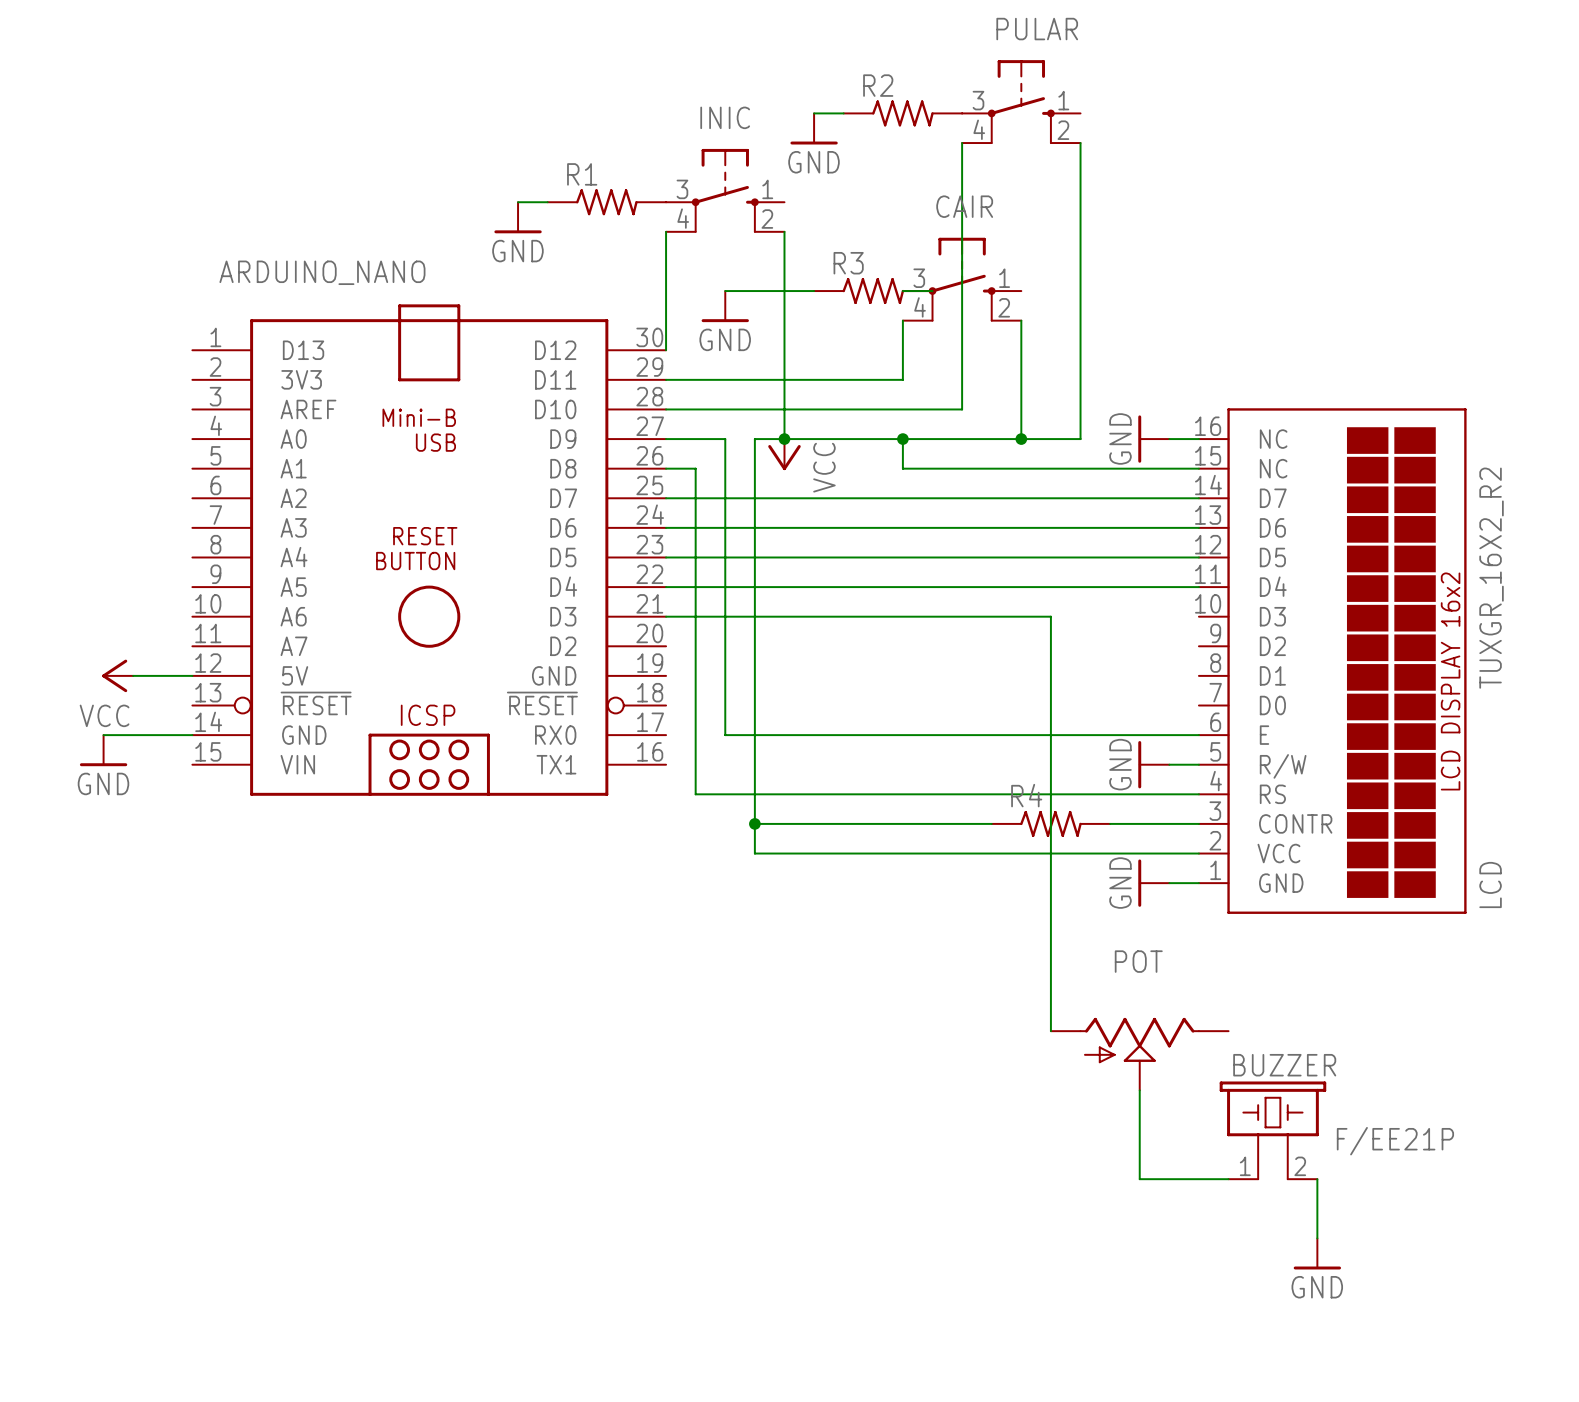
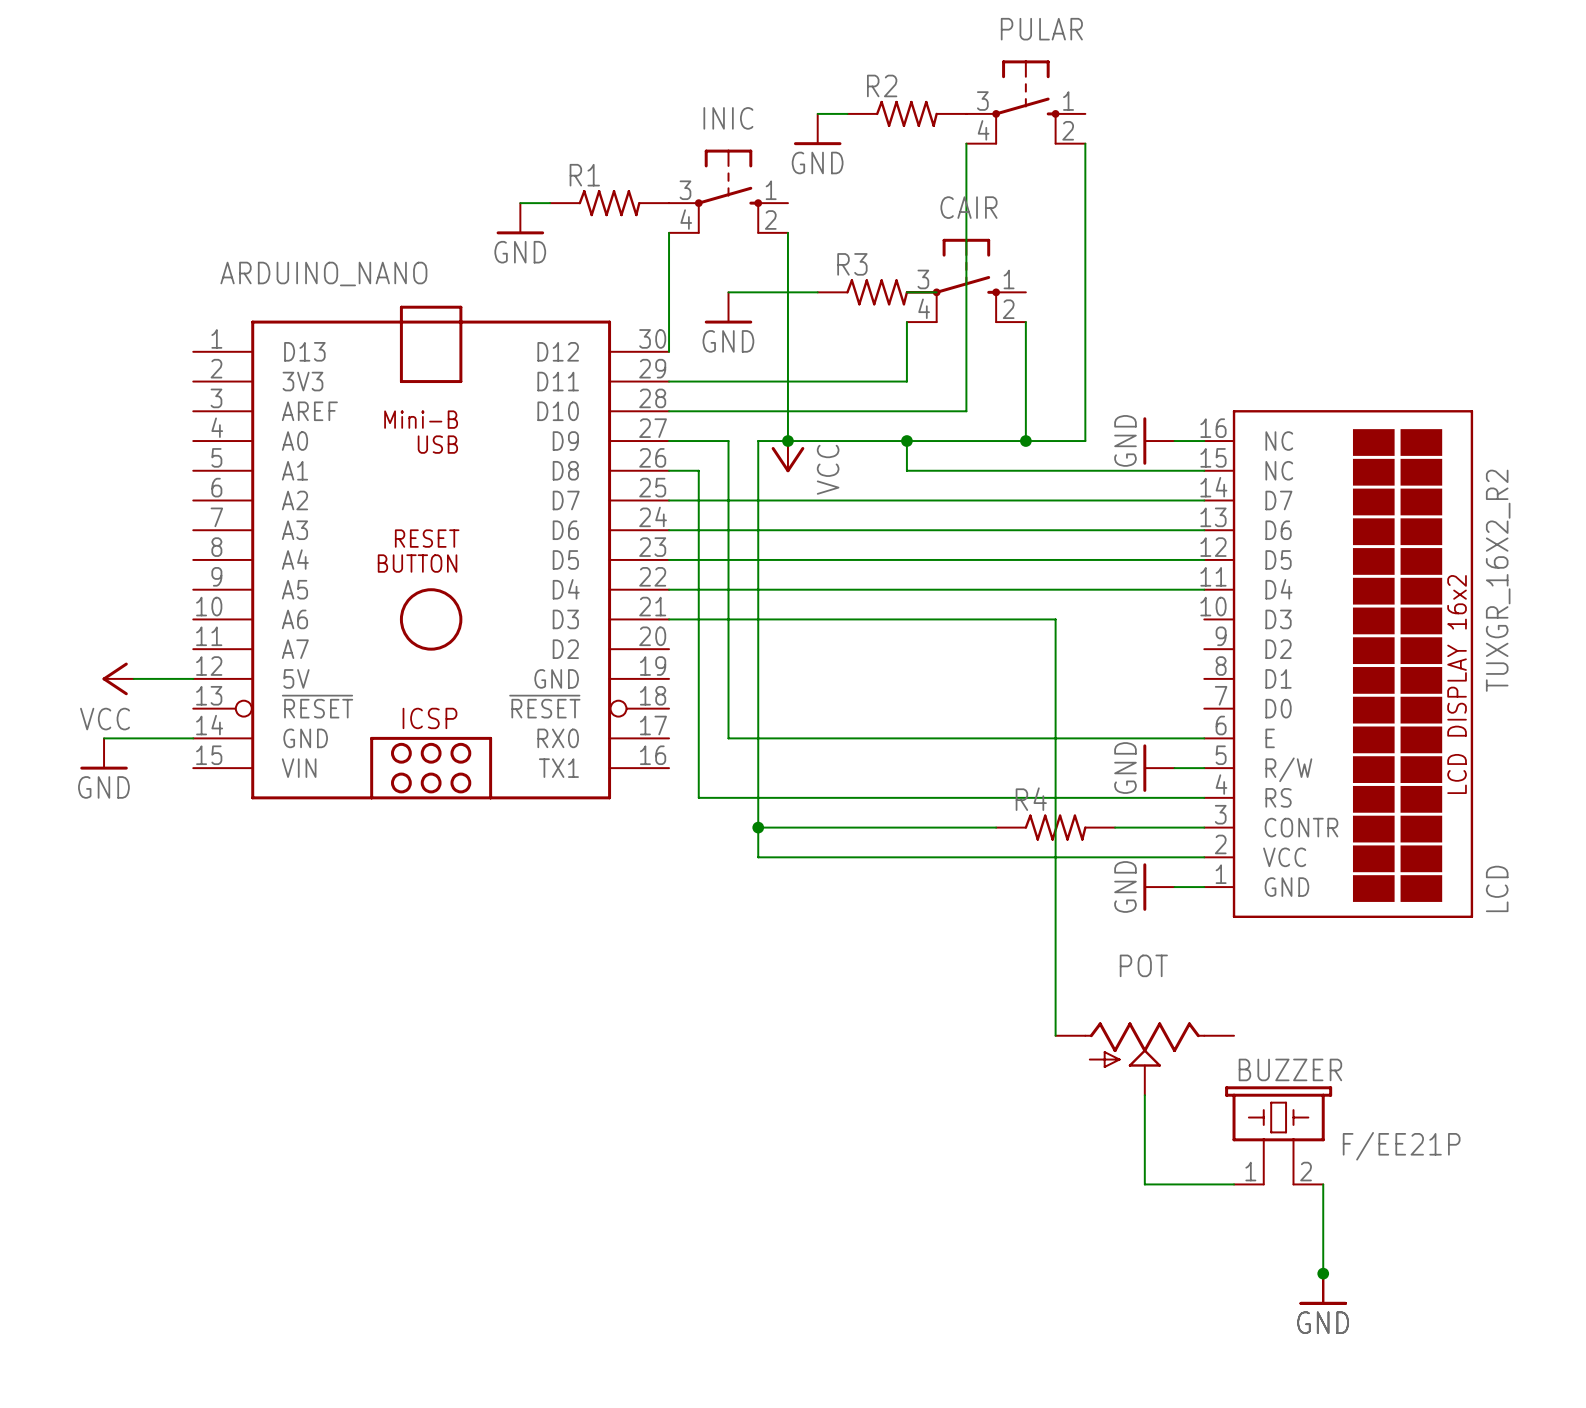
power symbol position: GND (1317, 1253) -> GND (1323, 1289)
junction: none -> (1323, 1273)

